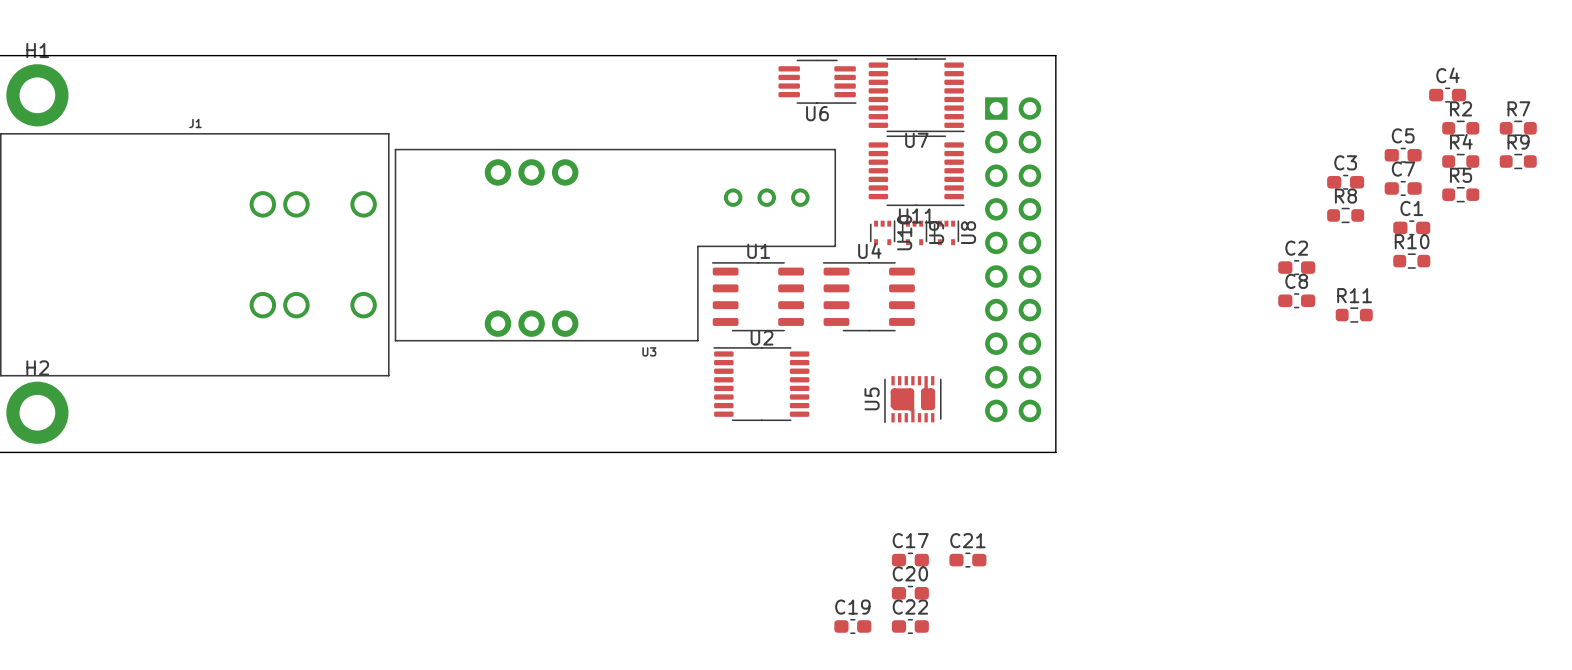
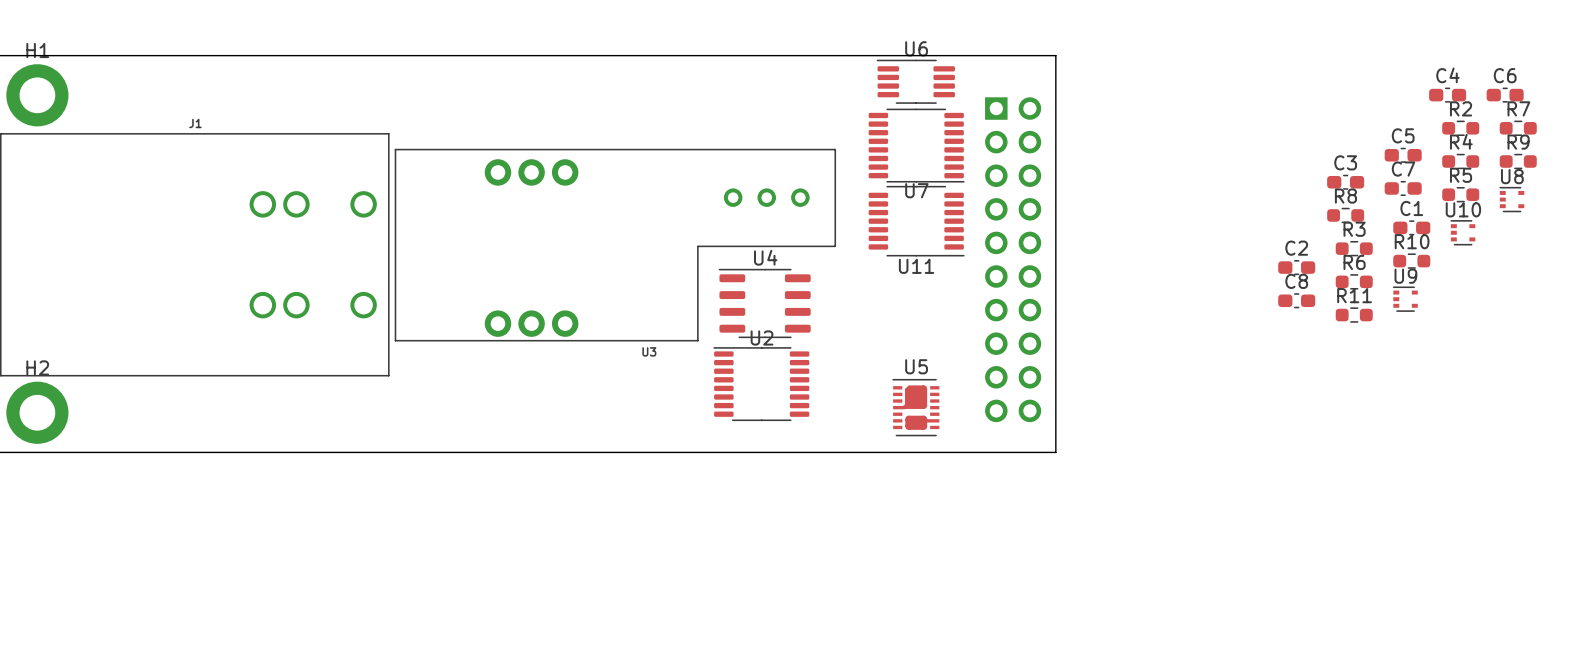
U6 rotation: 0° (817, 81) -> 180° (915, 81)
U6 position: (817, 81) -> (915, 81)
U7 position: (916, 95) -> (916, 145)
C6: none -> (1505, 95)
U11 position: (916, 170) -> (916, 221)
U10 rotation: 0° (882, 232) -> 90° counterclockwise (1462, 232)
U10 position: (882, 232) -> (1462, 232)
U9 rotation: 0° (914, 232) -> 90° counterclockwise (1405, 299)
U9 position: (914, 232) -> (1405, 299)
U8 rotation: 0° (946, 232) -> 90° counterclockwise (1511, 199)
U8 position: (946, 232) -> (1511, 199)
R3: none -> (1354, 248)
R6: none -> (1354, 281)
U1: (757, 296) -> none
U4 position: (868, 296) -> (764, 303)
U5 rotation: 0° (912, 399) -> 90° clockwise (915, 407)
C17: (910, 560) -> none
C21: (967, 560) -> none
C20: (910, 593) -> none
C19: (852, 626) -> none
C22: (910, 626) -> none

